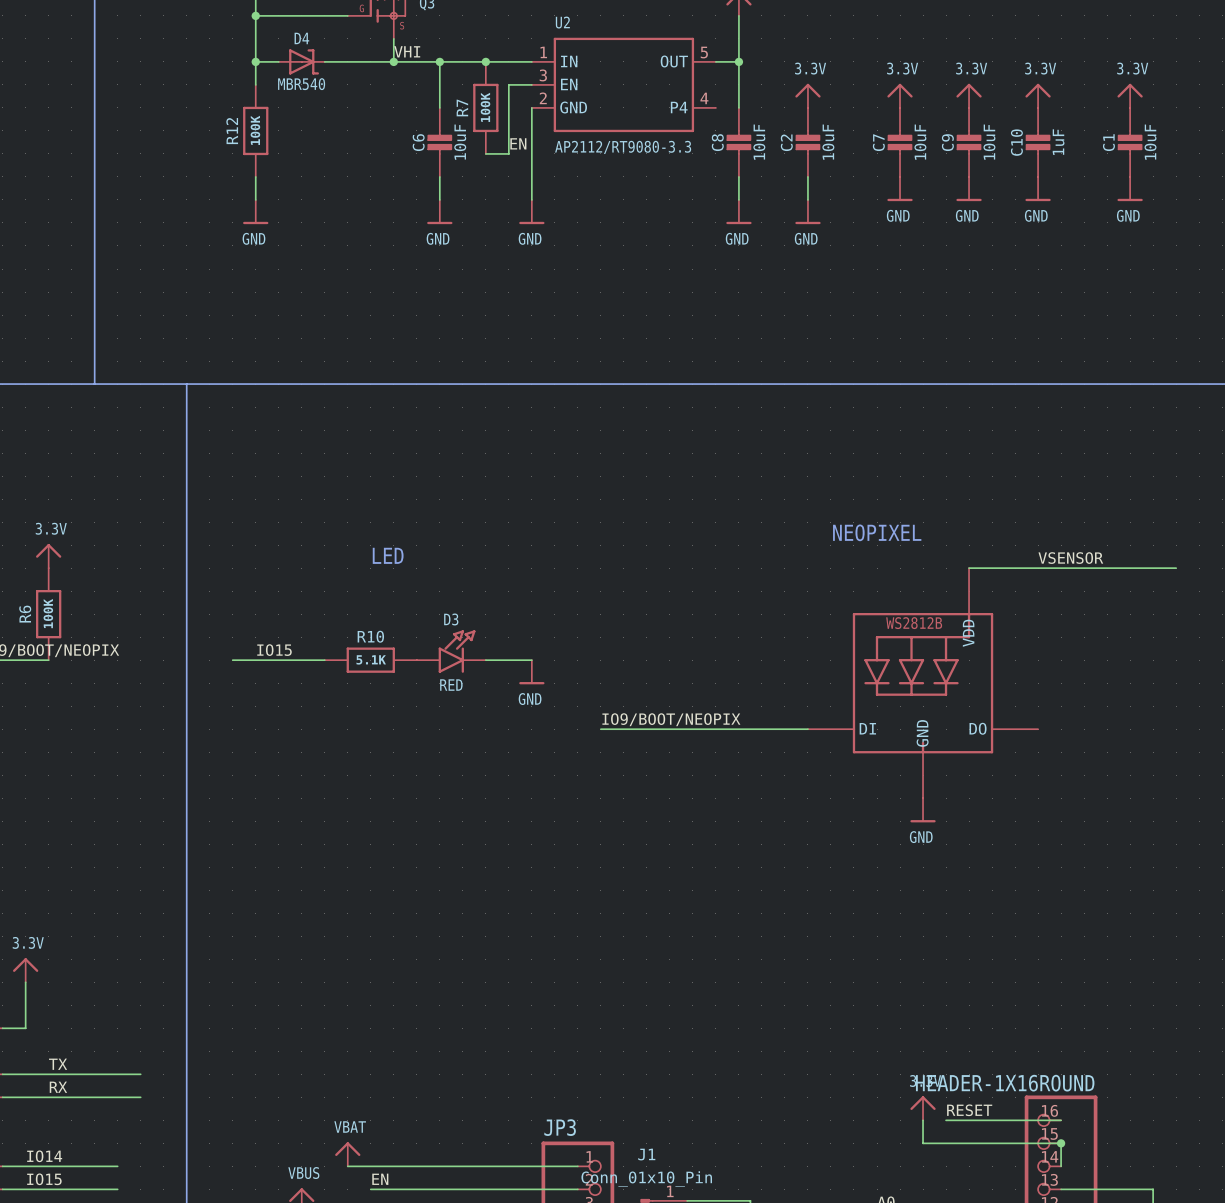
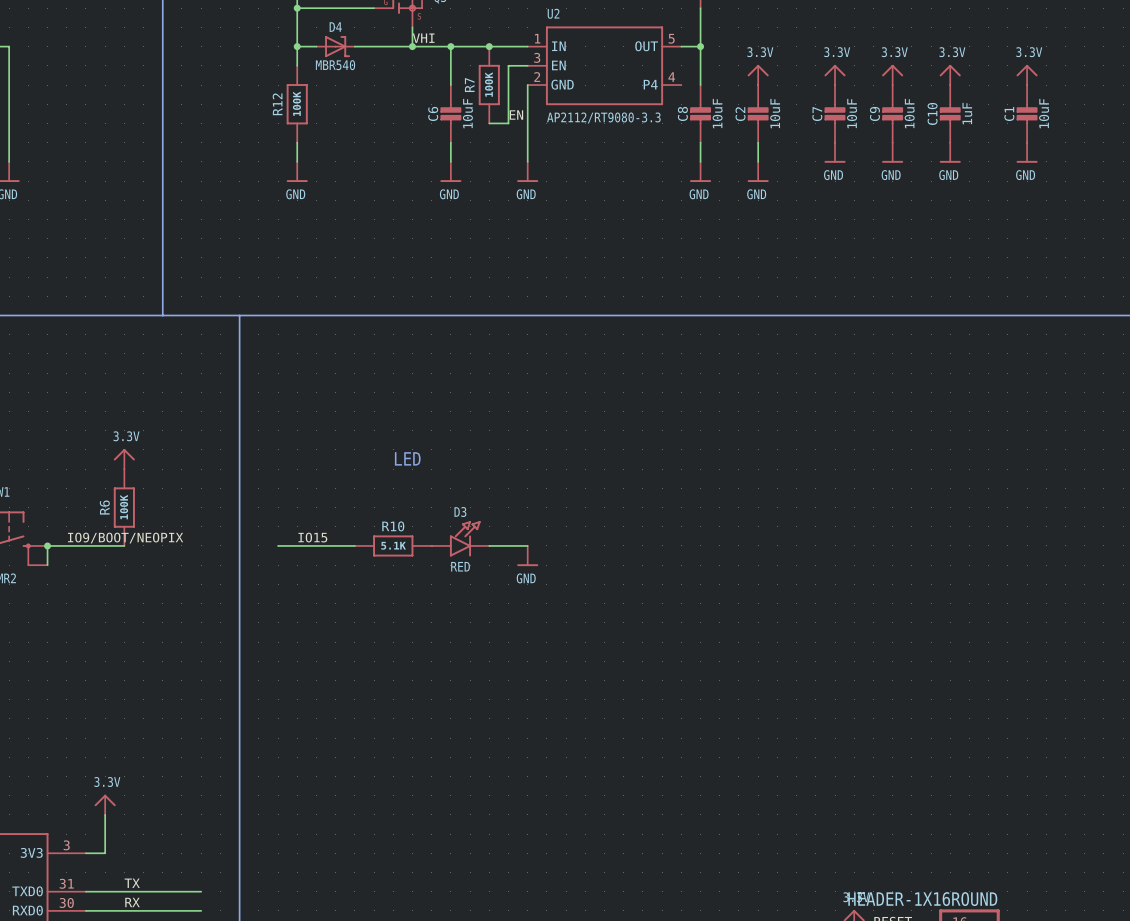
text: NEOPIXEL (877, 532) -> none
label: VSENSOR (1070, 558) -> none
wire: (969, 568) (1176, 568) -> none
part: (923, 683) -> none
label: IO9/BOOT/NEOPIX (671, 719) -> none
wire: (600, 729) (807, 729) -> none
power symbol: GND (923, 810) -> none

